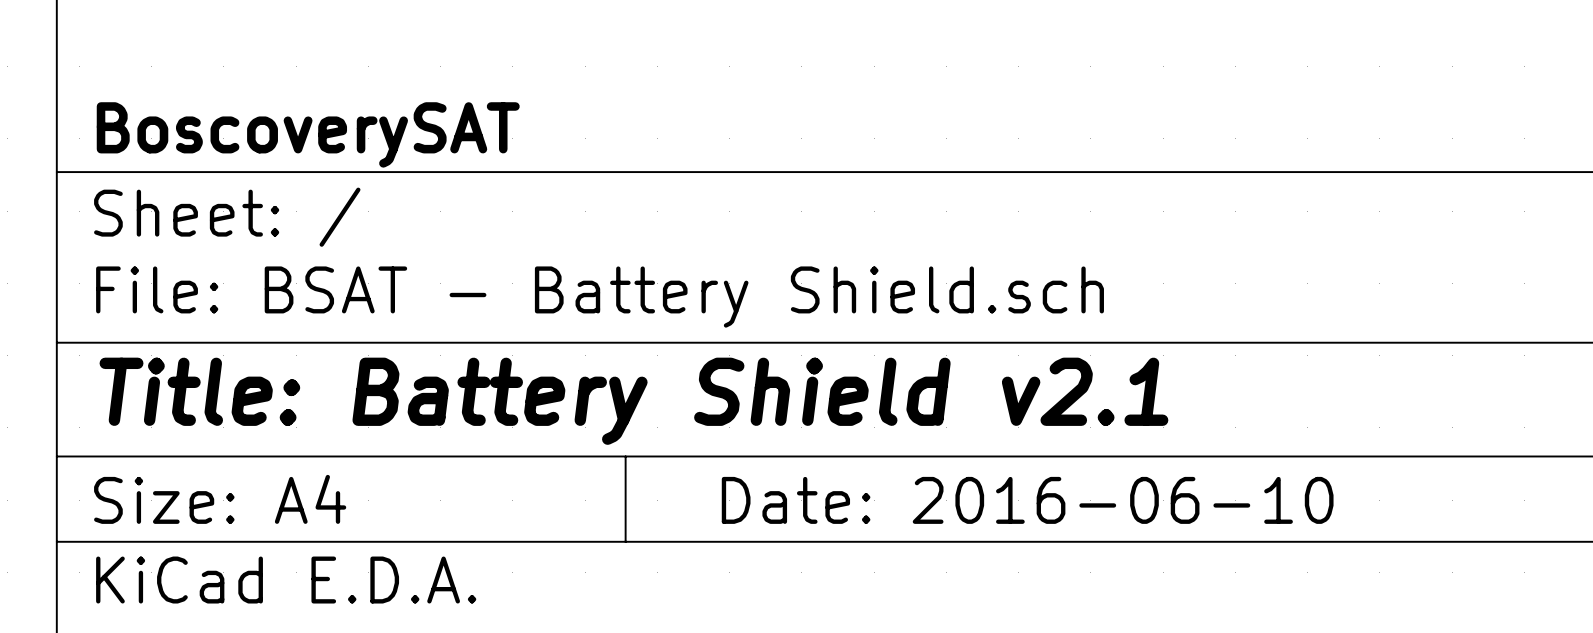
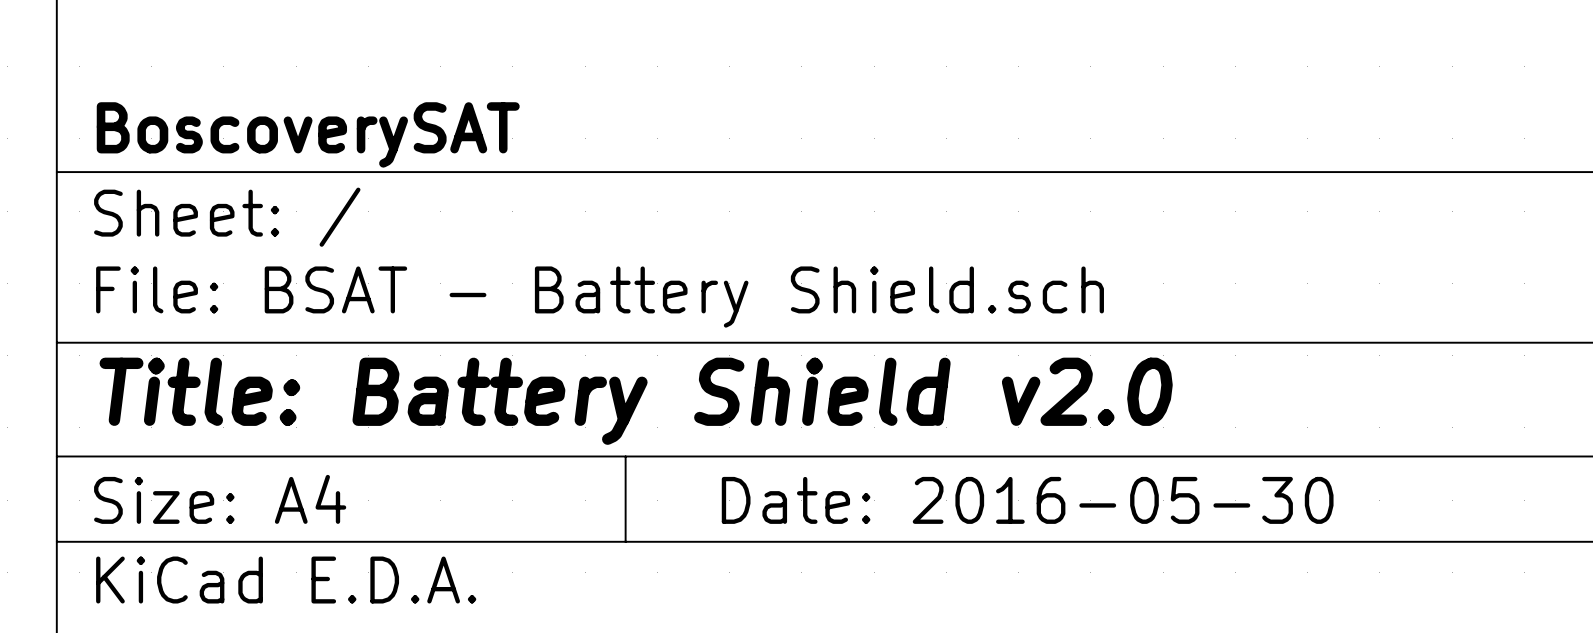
title block: Title: Battery Shield v2.1 (633, 401) -> Title: Battery Shield v2.0 (636, 401)
title block: Date: 2016-06-10 (1027, 500) -> Date: 2016-05-30 (1027, 500)

